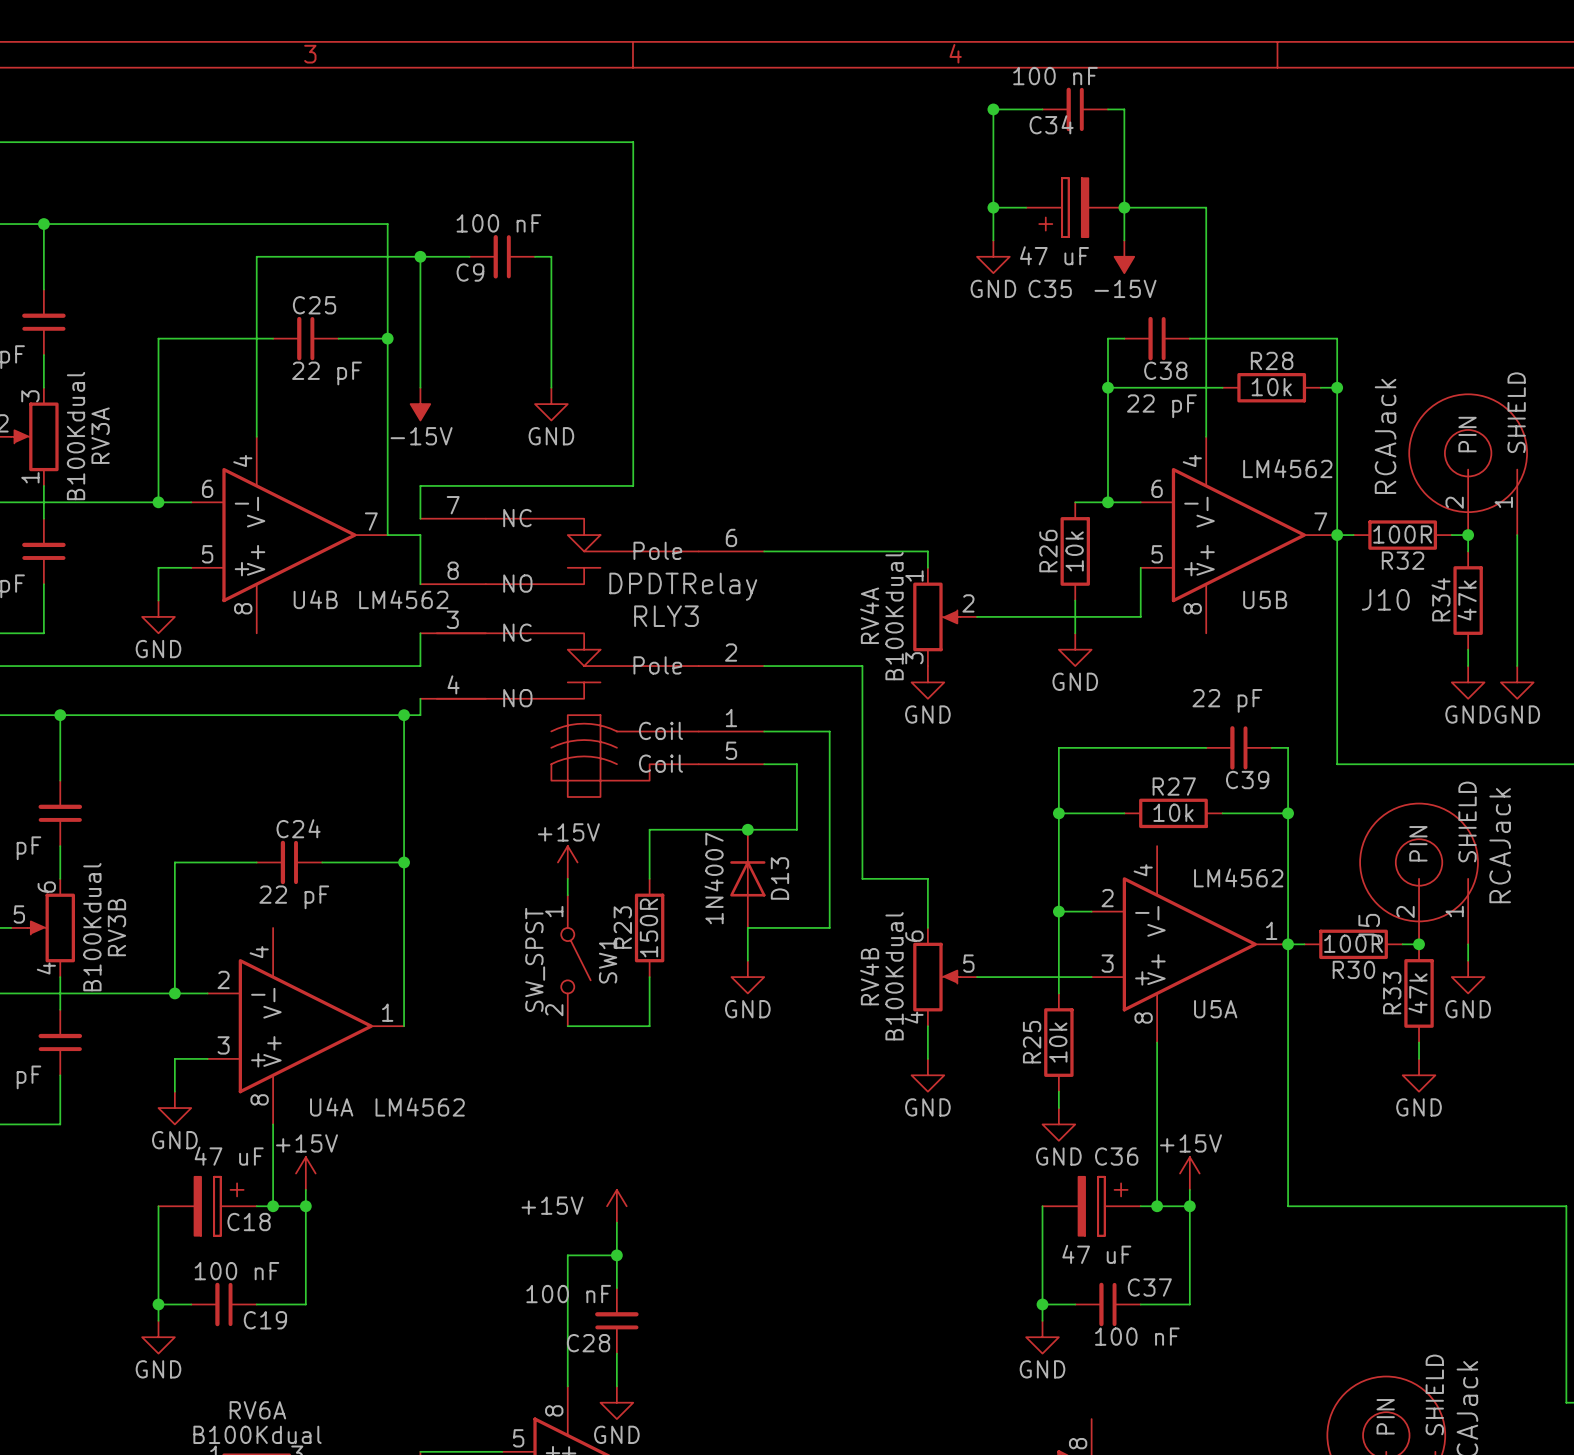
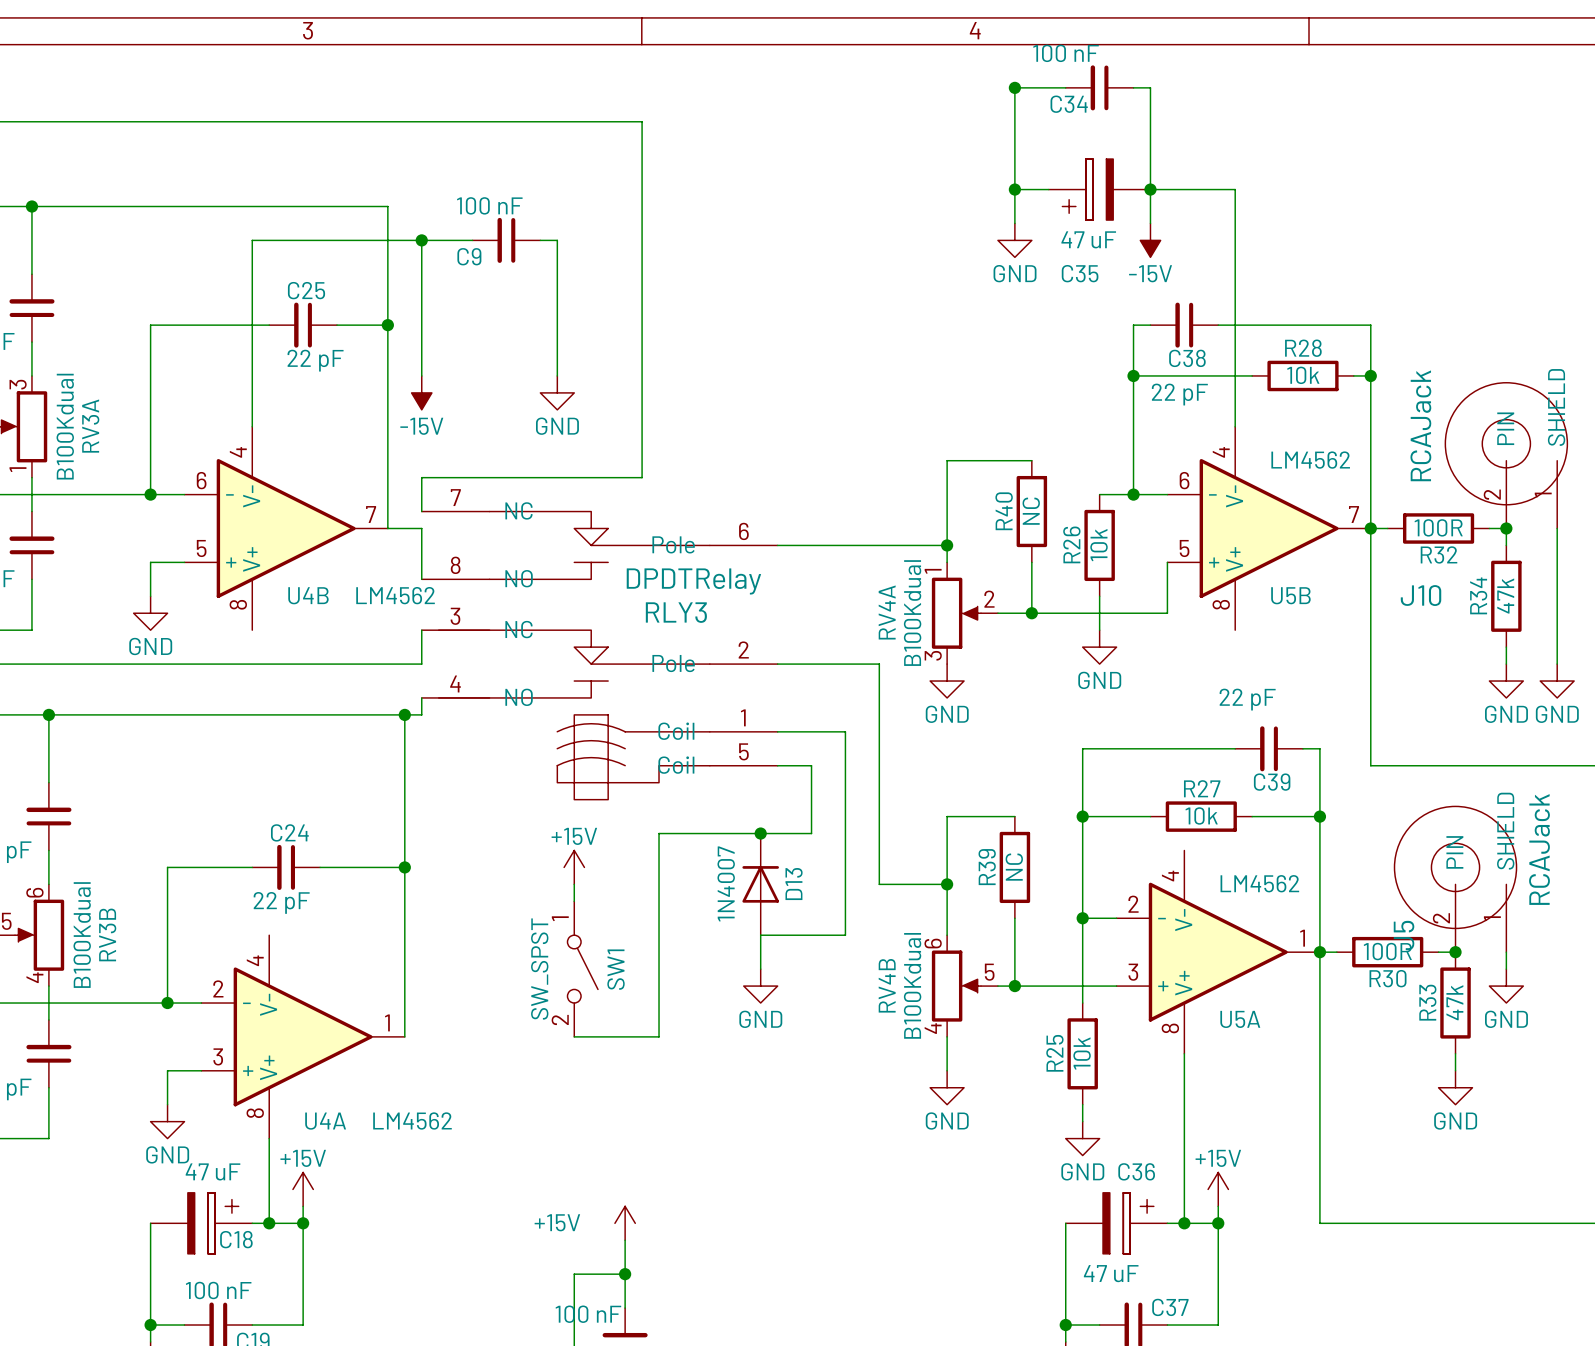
wire: none -> (1031, 460) (947, 460) (947, 545)
R40: none -> NC (1031, 511)
junction: none -> (947, 545)
wire: none -> (1031, 562) (1031, 613)
junction: none -> (1031, 613)
wire: none -> (1014, 816) (947, 816) (947, 884)
R39: none -> NC (1014, 867)
wire: none -> (659, 884) (659, 986)
junction: none -> (947, 884)
wire: none -> (1014, 918) (1014, 986)
R23: 150R (649, 927) -> none
junction: none -> (1014, 986)

